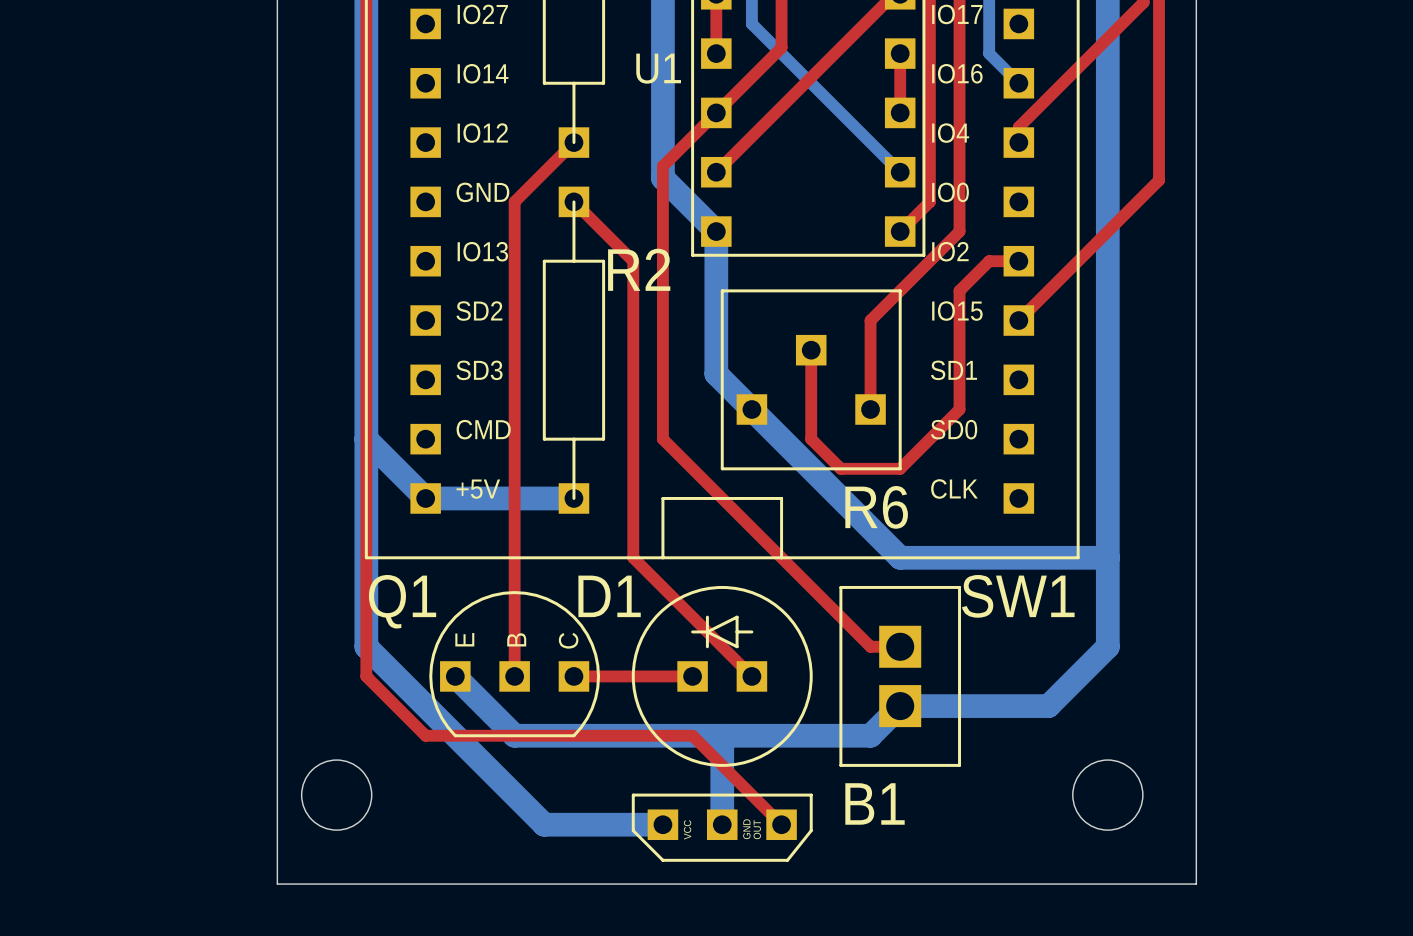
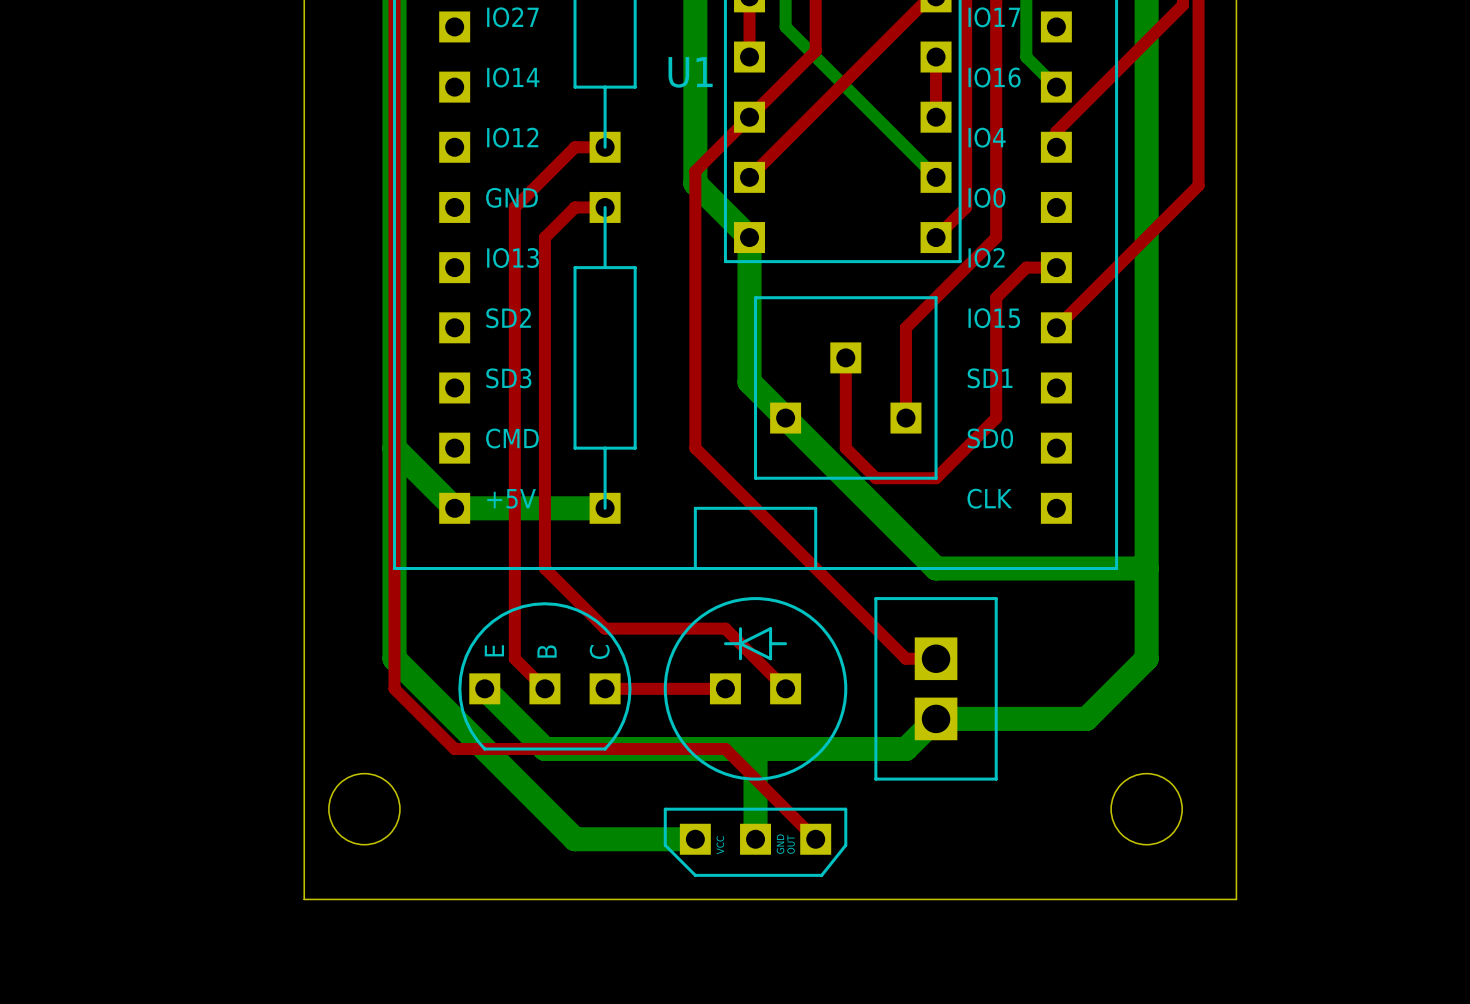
top track: (573, 142) (514, 201) (514, 231) -> (605, 207) (575, 207) (544, 237)
top track: none -> (605, 147) (575, 147) (514, 207) (514, 658) (544, 688)
top track: (573, 201) (633, 261) (633, 557) (692, 617) -> none
text: R2 (639, 269) -> none
text: R6 (876, 507) -> none
top track: (514, 557) (514, 676) -> (544, 568) (605, 628) (725, 628)
text: D1 (609, 596) -> none
text: SW1 (1018, 596) -> none
text: Q1 (402, 601) -> none
text: B1 (875, 803) -> none

